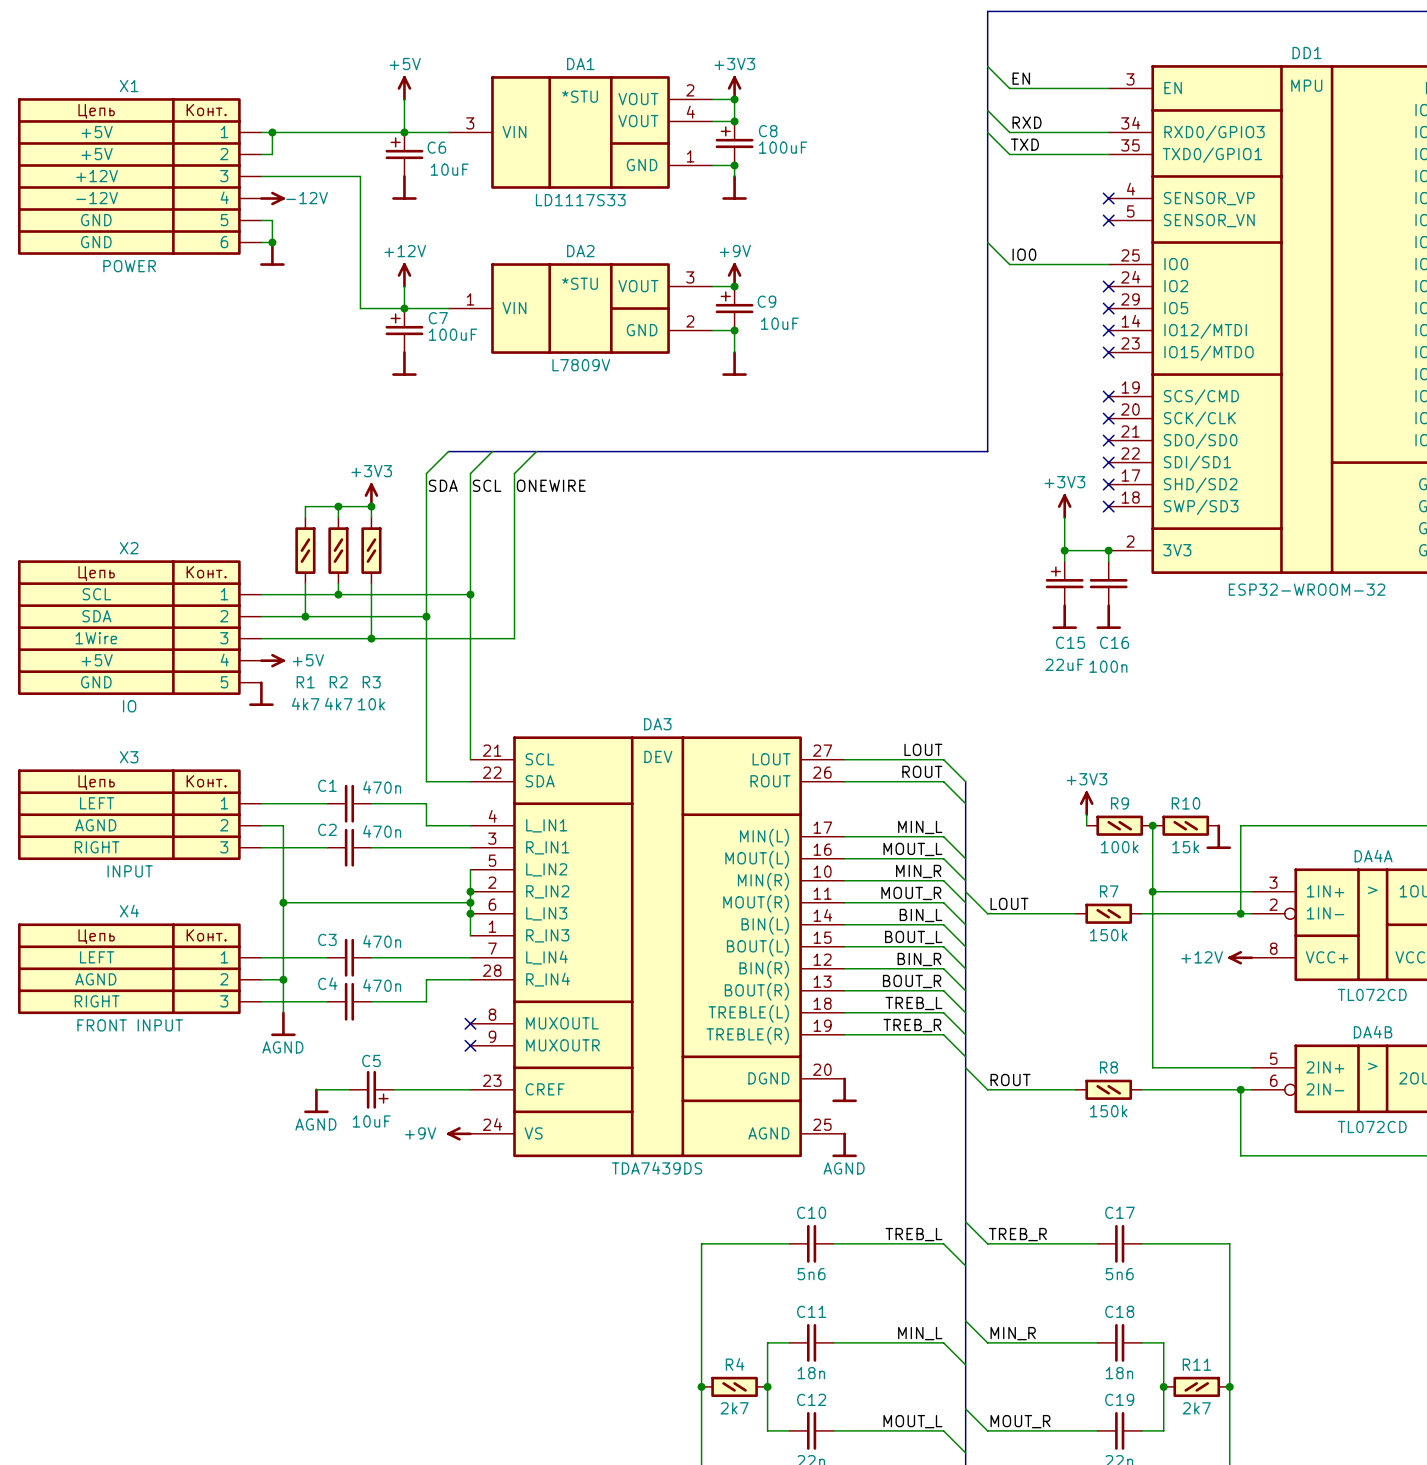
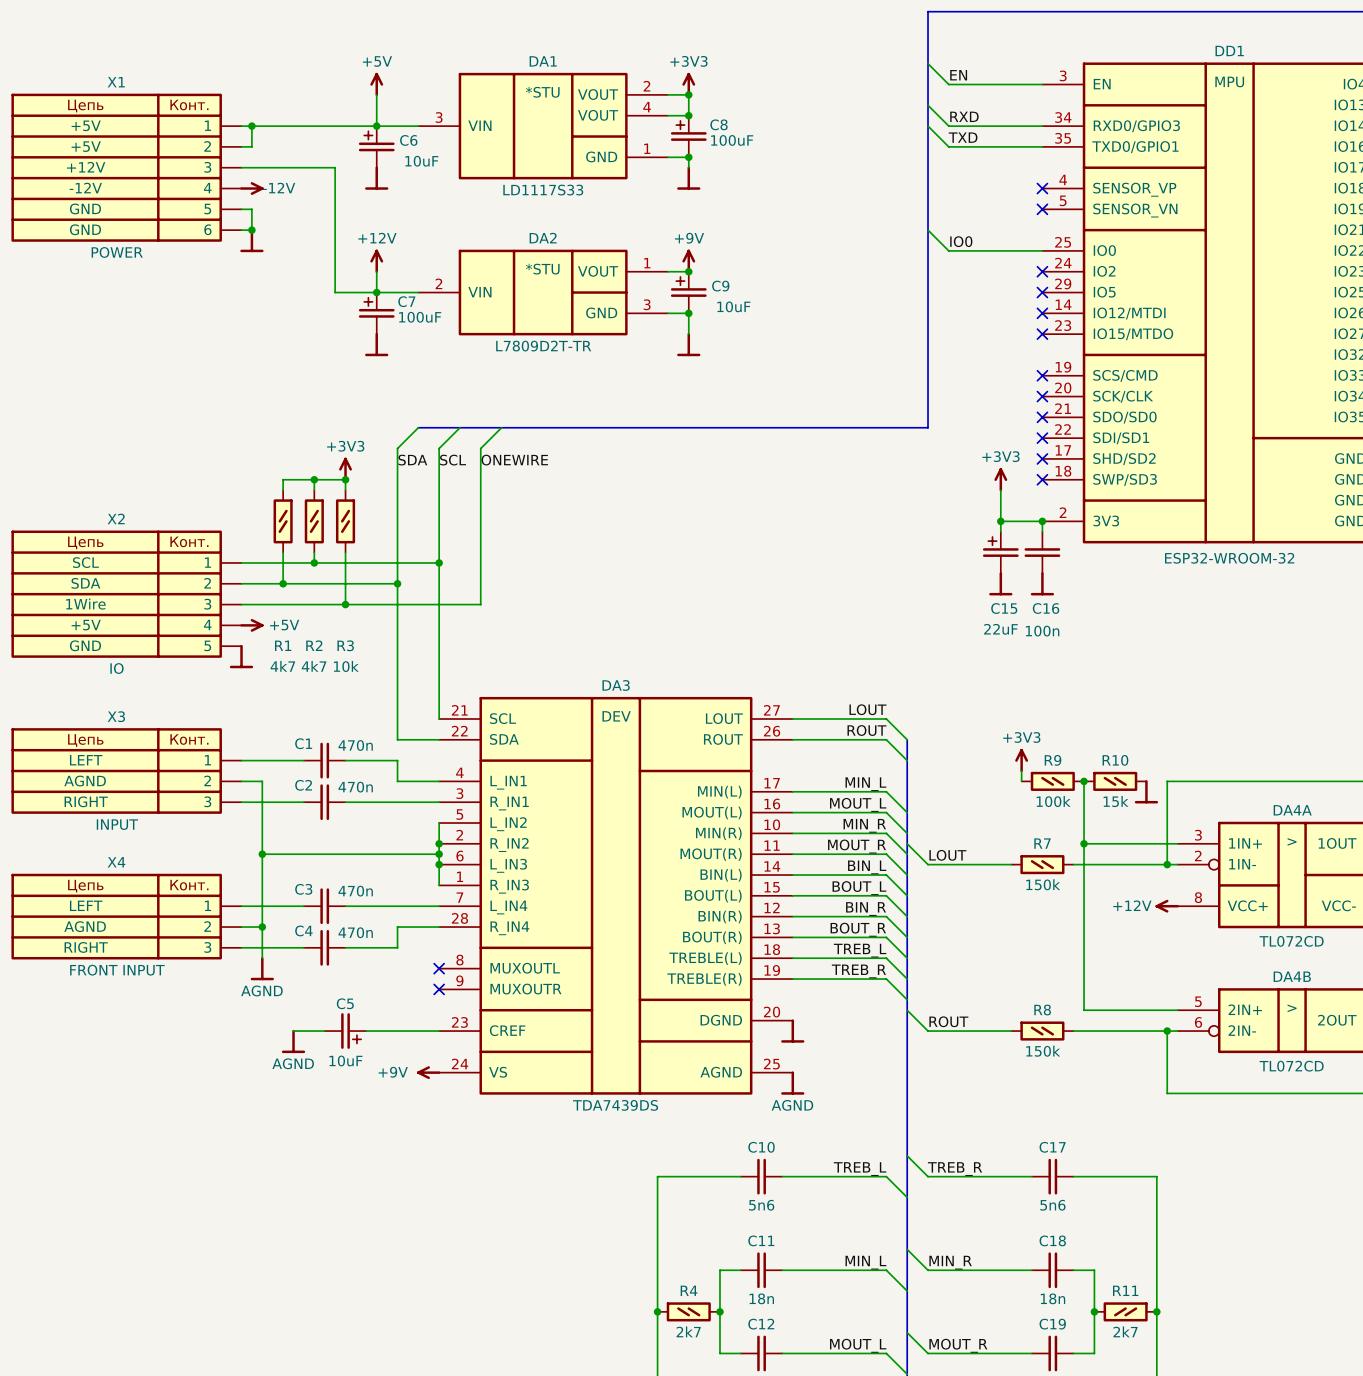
DA2 pin number: 3 (690, 277) -> 1 (647, 263)
DA2 pin number: 1 (470, 299) -> 2 (438, 283)
DA2 pin number: 2 (690, 321) -> 3 (647, 304)
DA2 value: L7809V (581, 365) -> L7809D2T-TR (543, 346)

